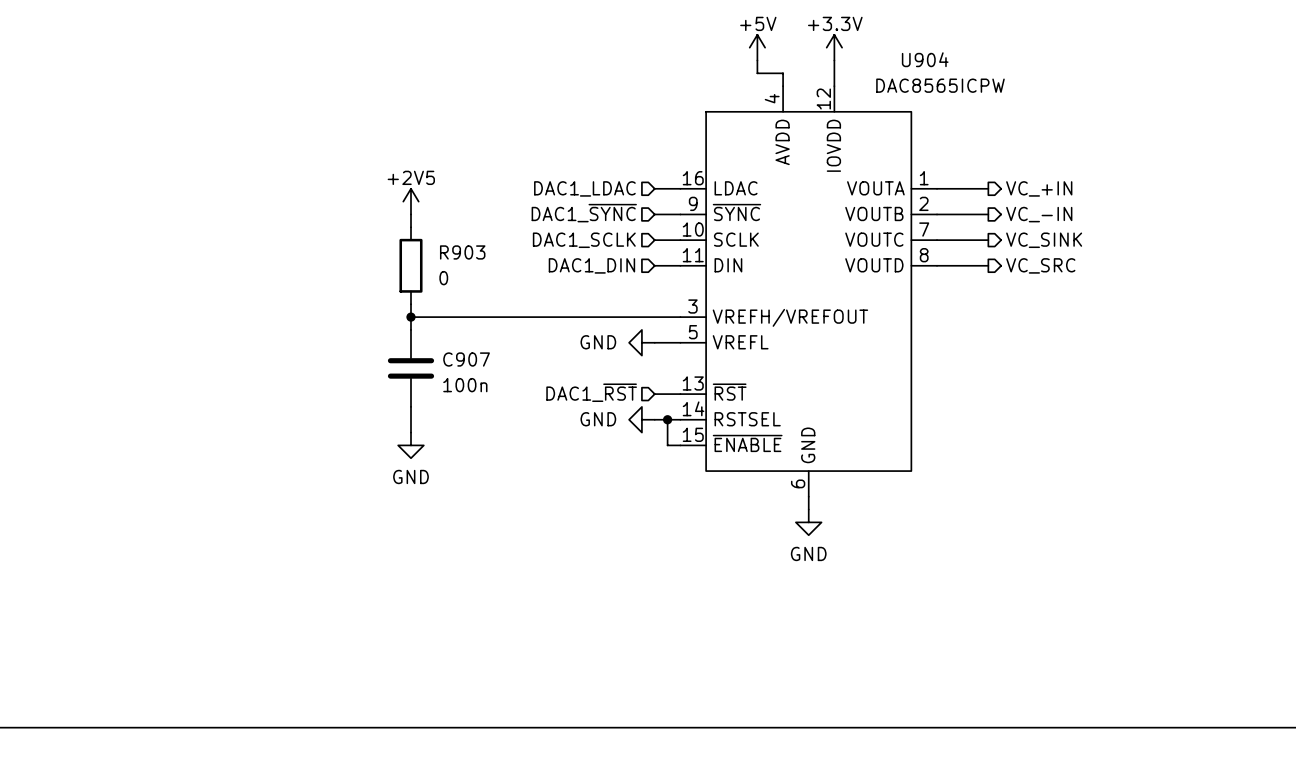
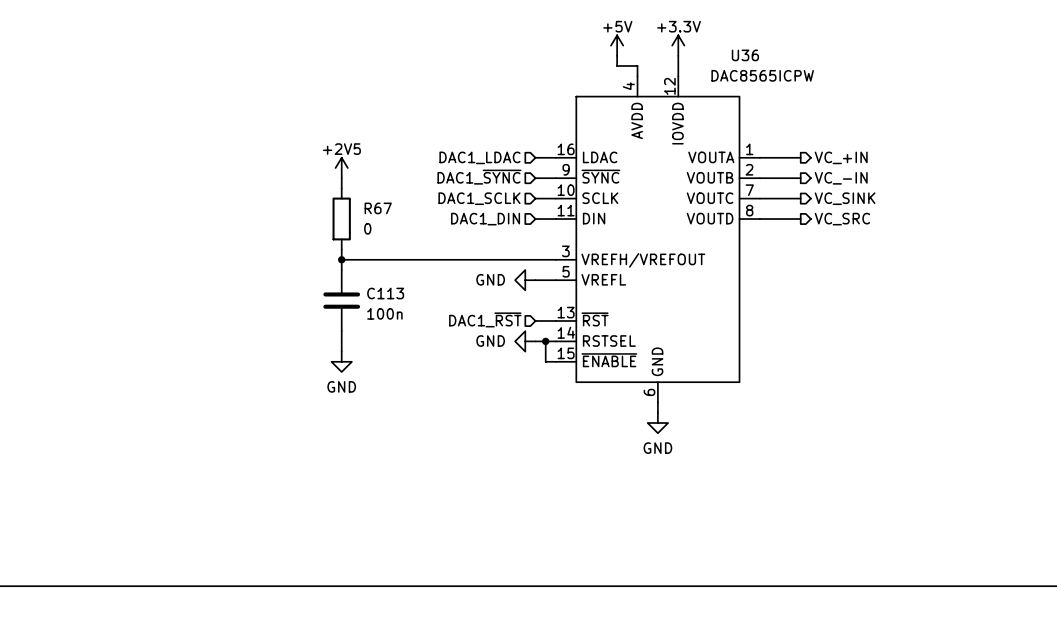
U904 name: U904 (925, 59) -> U36 (745, 55)
R903 name: R903 (462, 252) -> R67 (378, 208)
C907 name: C907 (466, 359) -> C113 (385, 293)

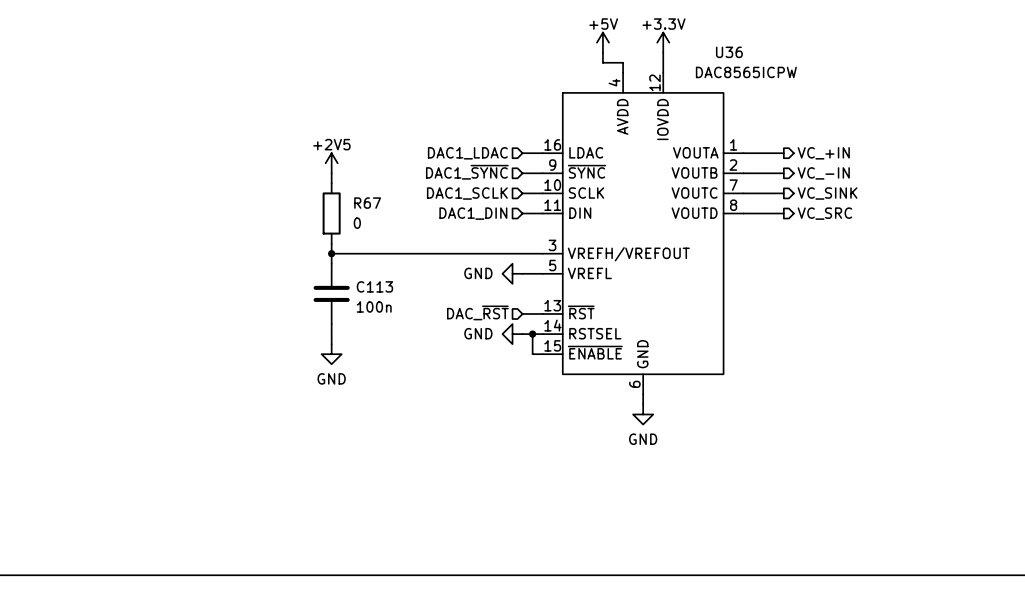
hierarchical label: DAC1_~{RST} (485, 319) -> DAC_~{RST} (477, 312)

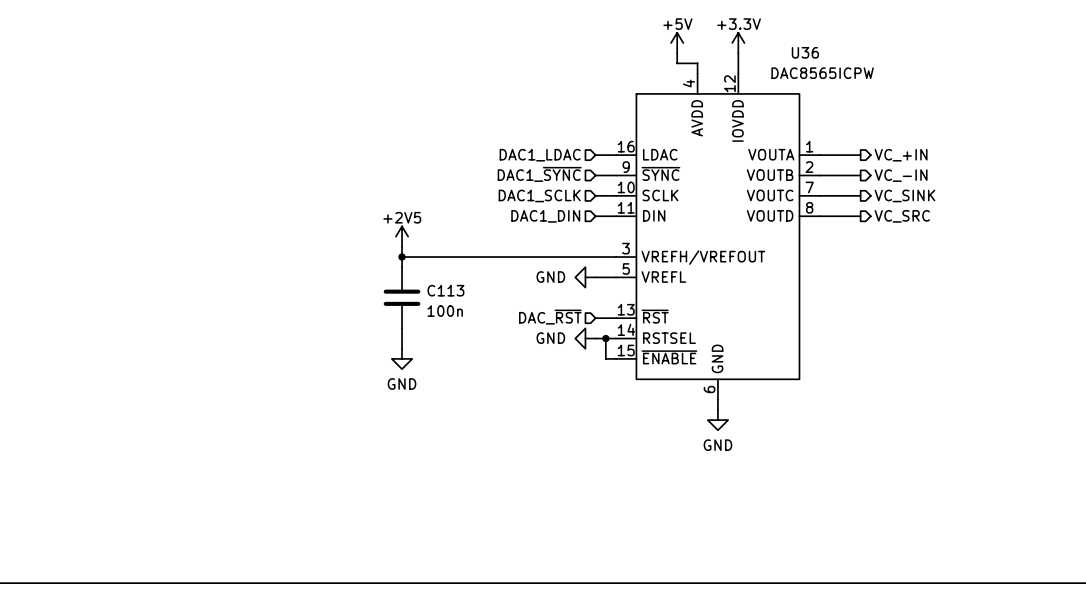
power symbol position: +2V5 (331, 163) -> +2V5 (402, 236)
wire: (331, 173) (331, 183) -> none
R67: 0 (331, 213) -> none

